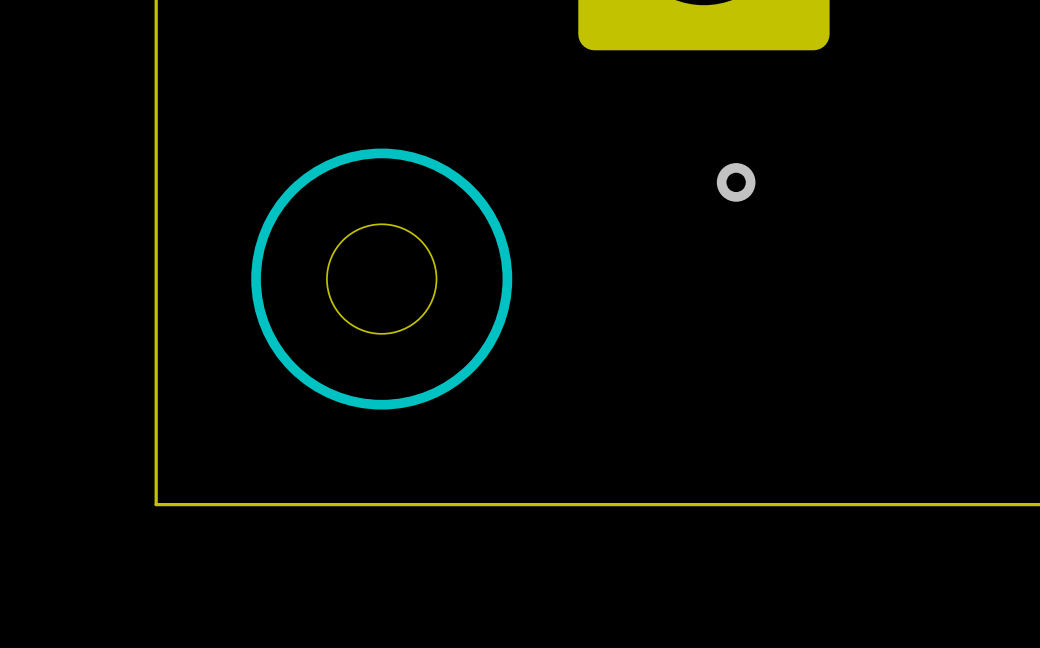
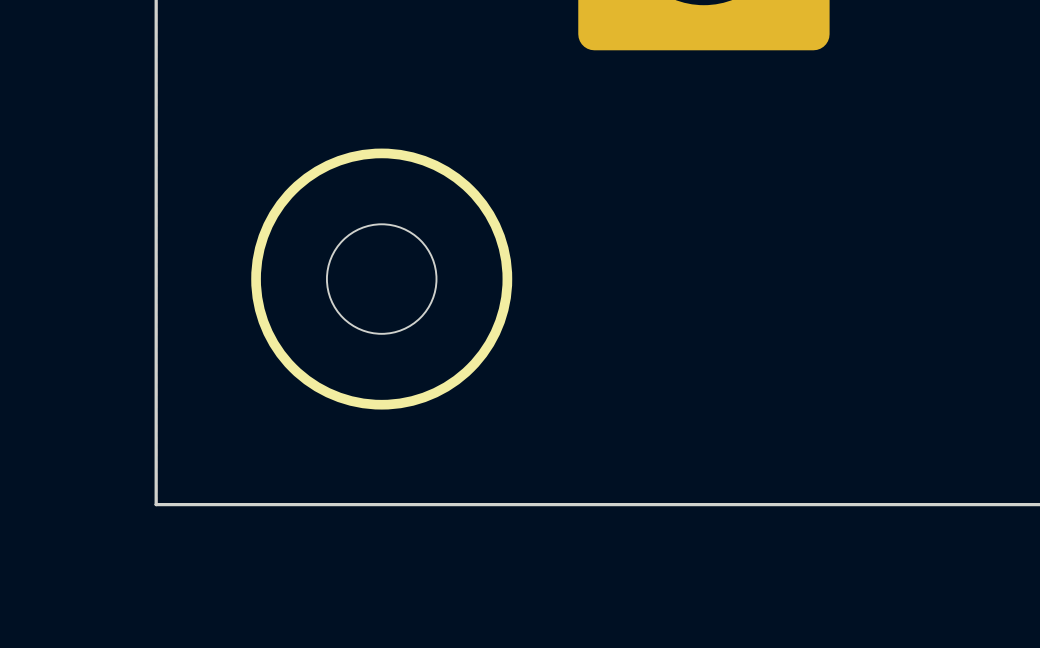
via: (736, 182) -> none

